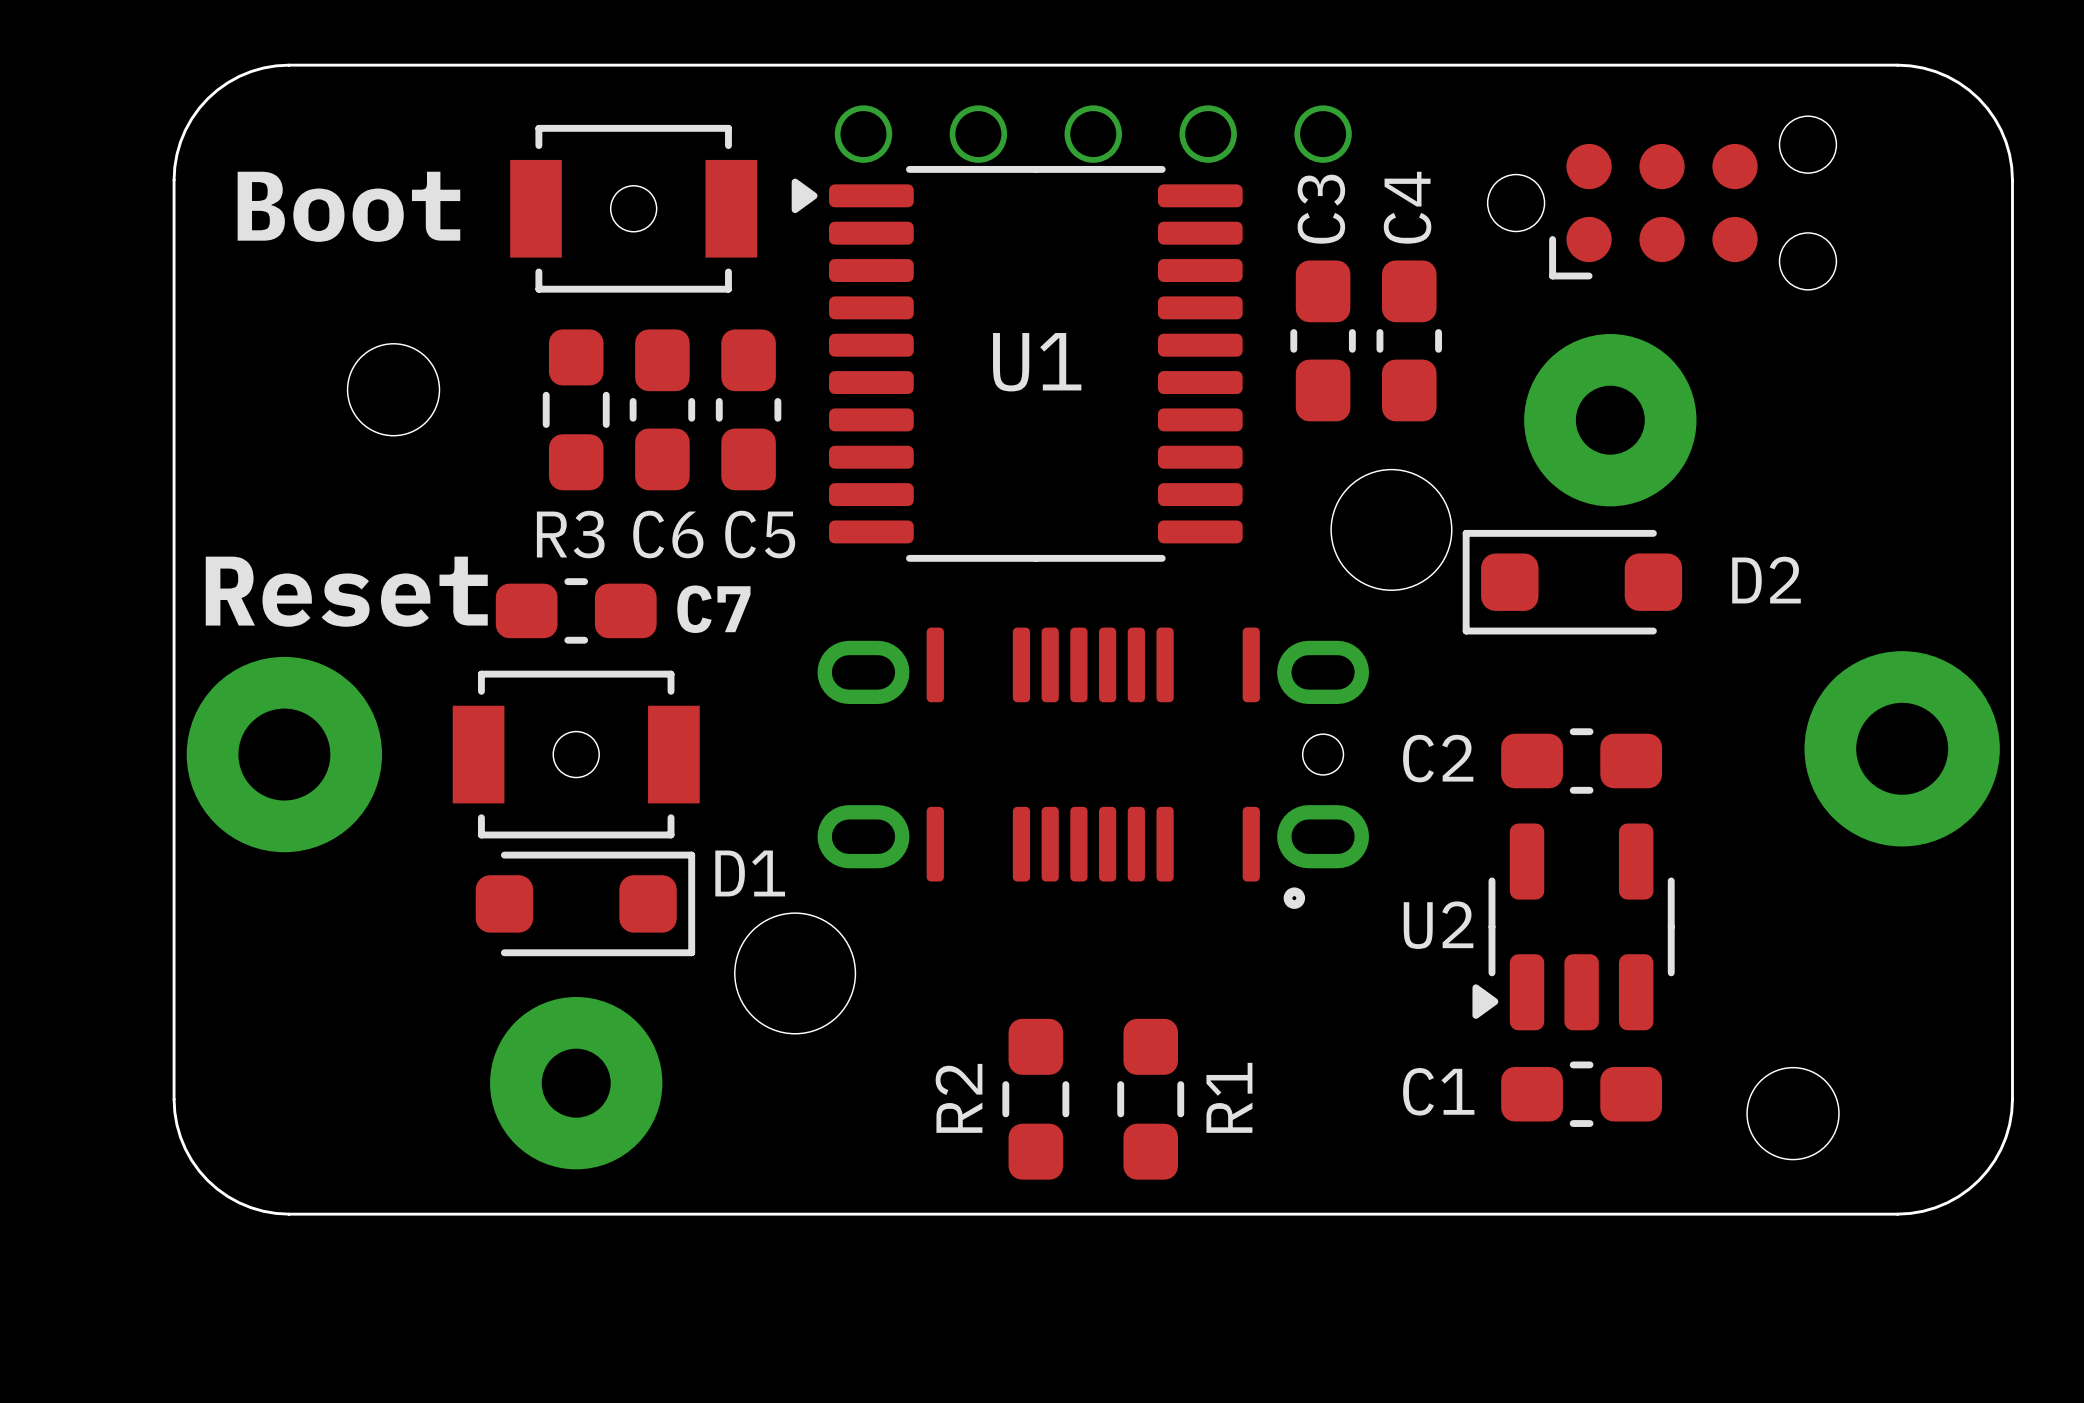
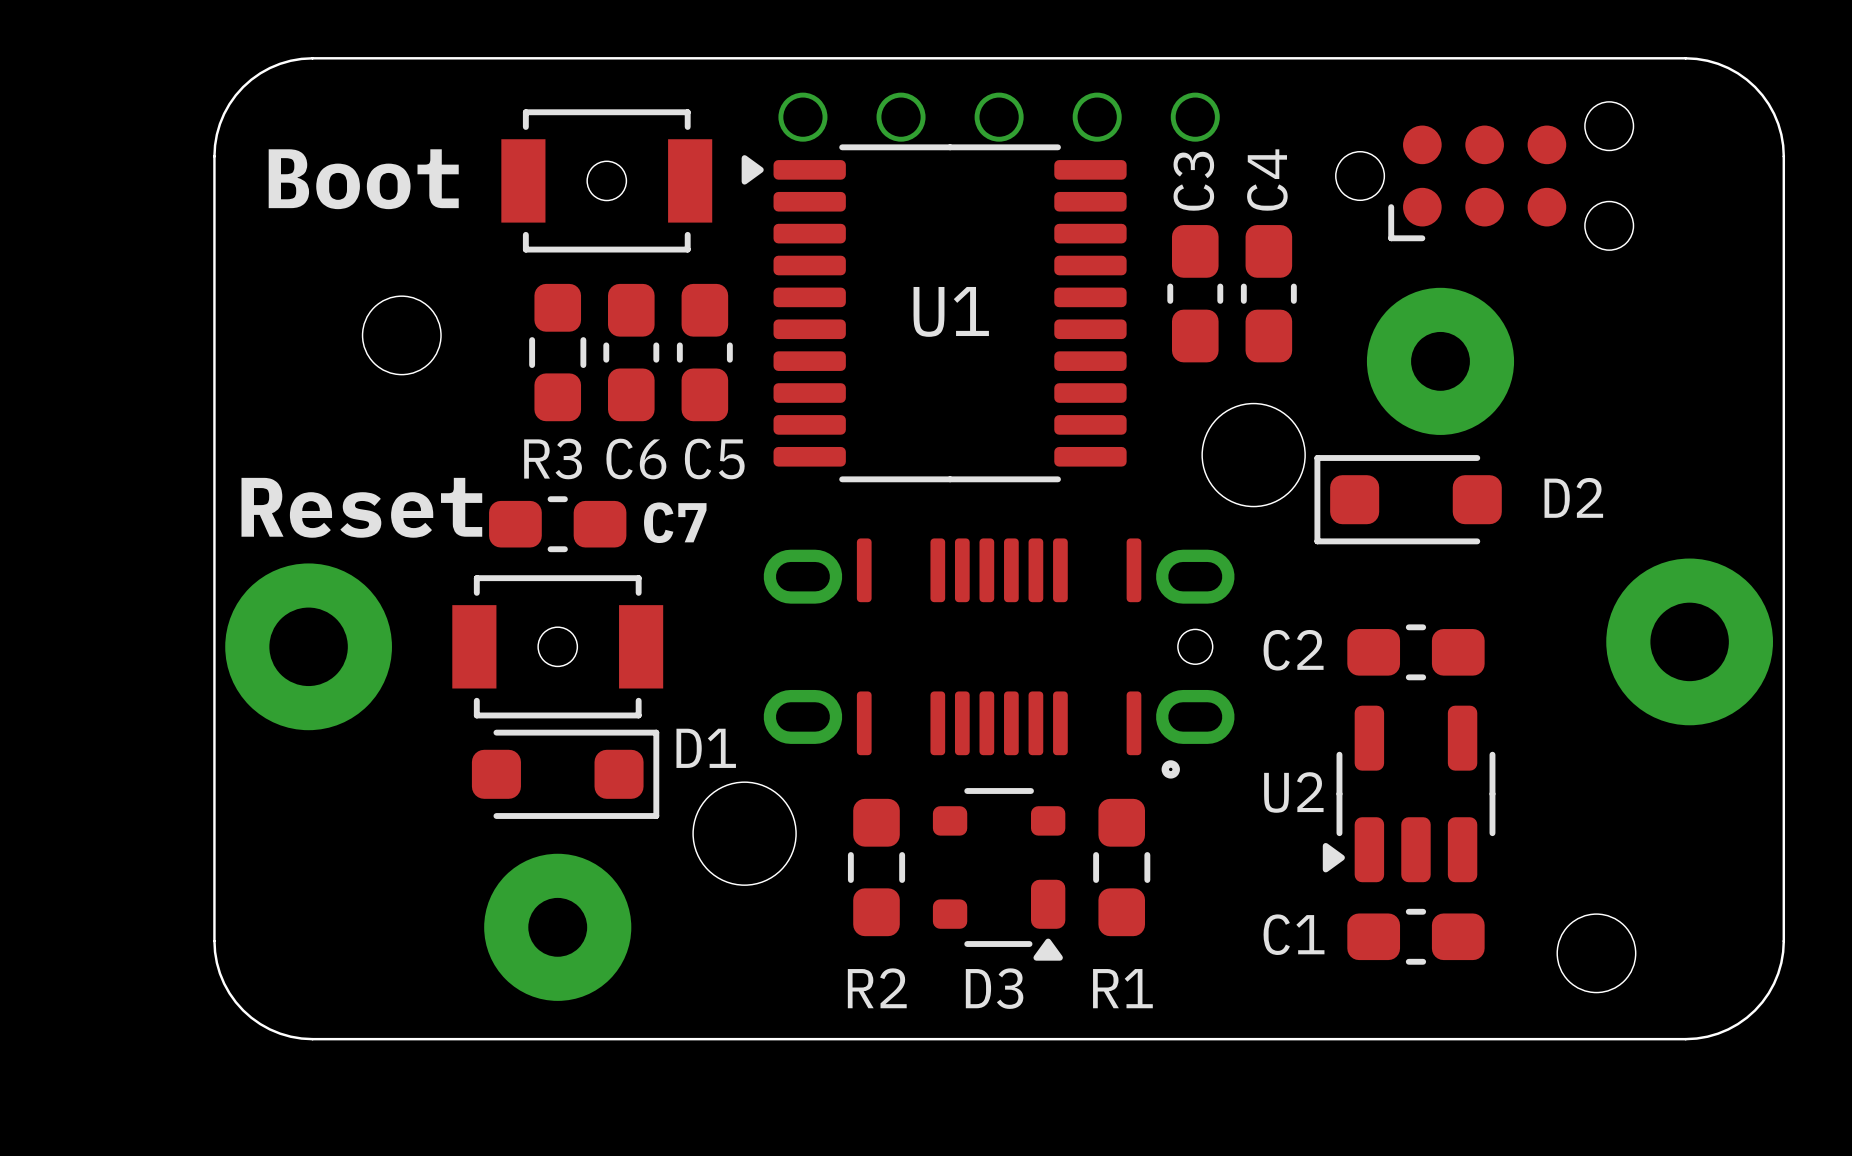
D3: none -> (999, 874)
R1 name rotation: 0° (1229, 1097) -> 90° clockwise (1122, 988)
R2 name rotation: 0° (959, 1098) -> 90° clockwise (877, 988)
R2 position: (1035, 1099) -> (876, 867)
R1 position: (1150, 1099) -> (1121, 867)

